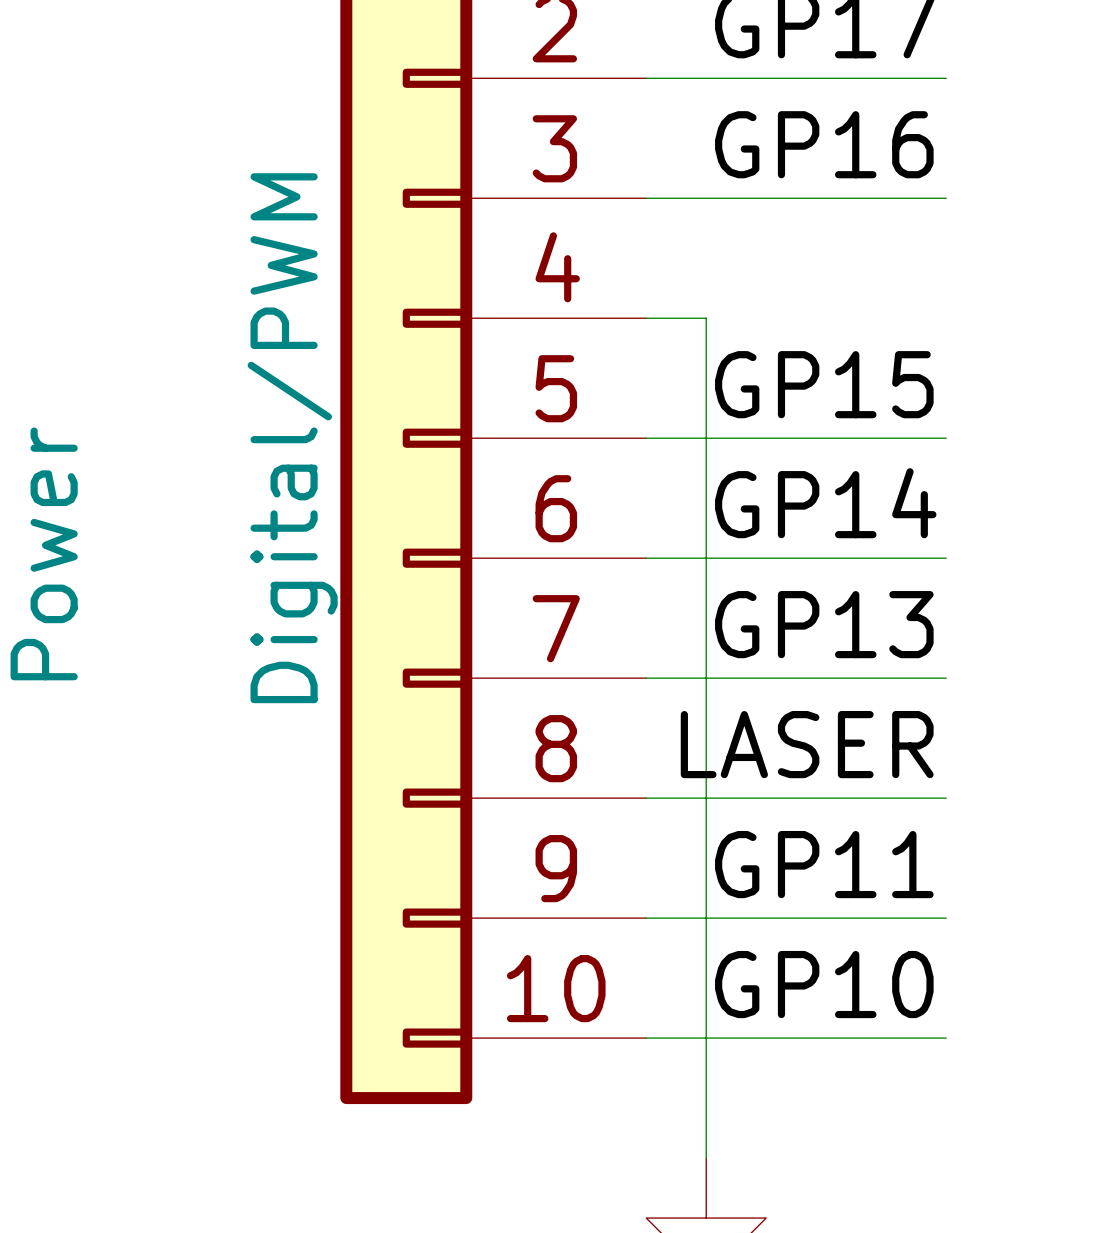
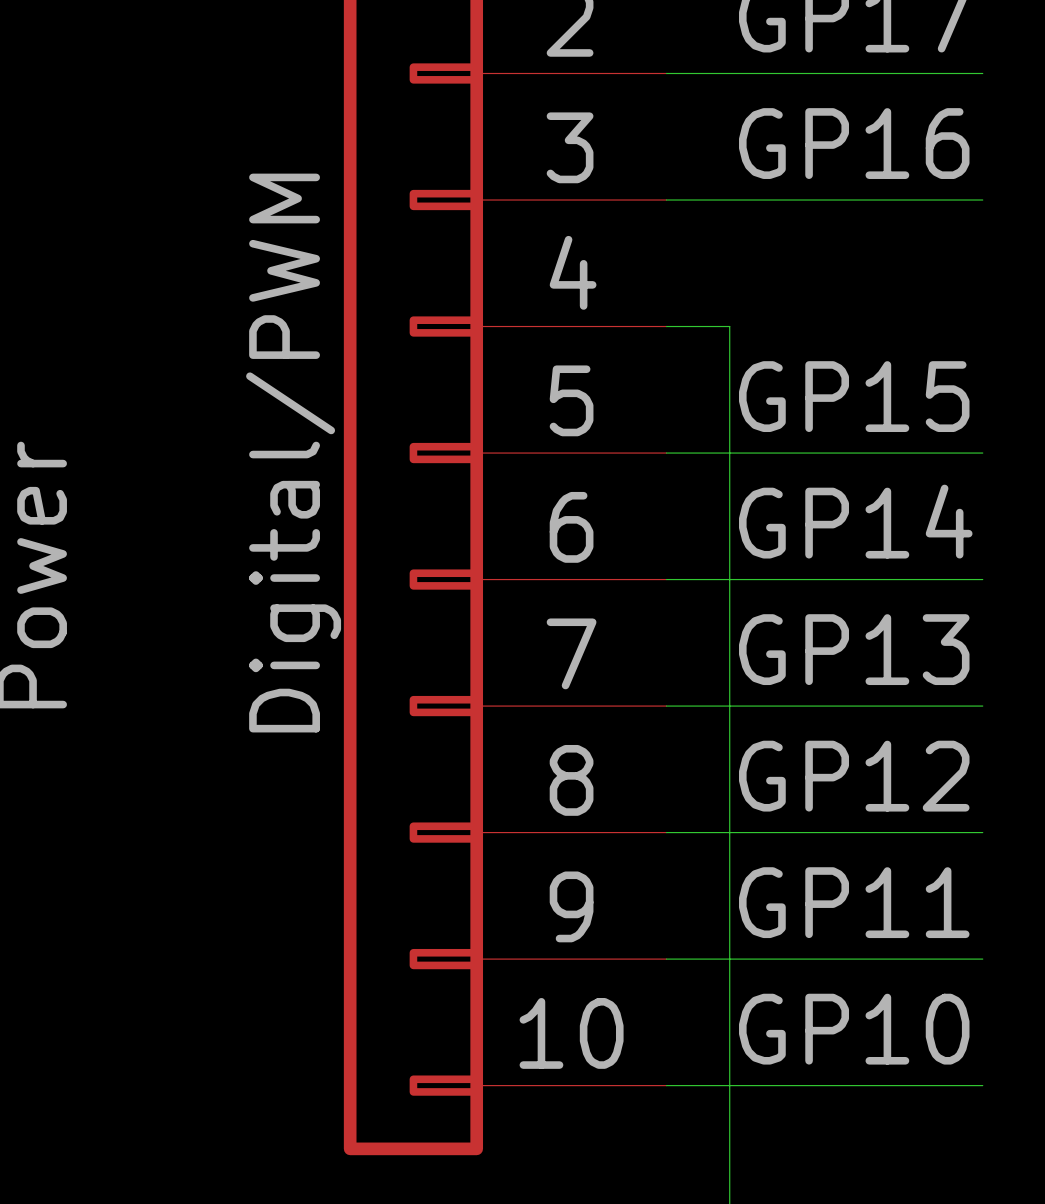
label: LASER (807, 744) -> GP12 (854, 776)

